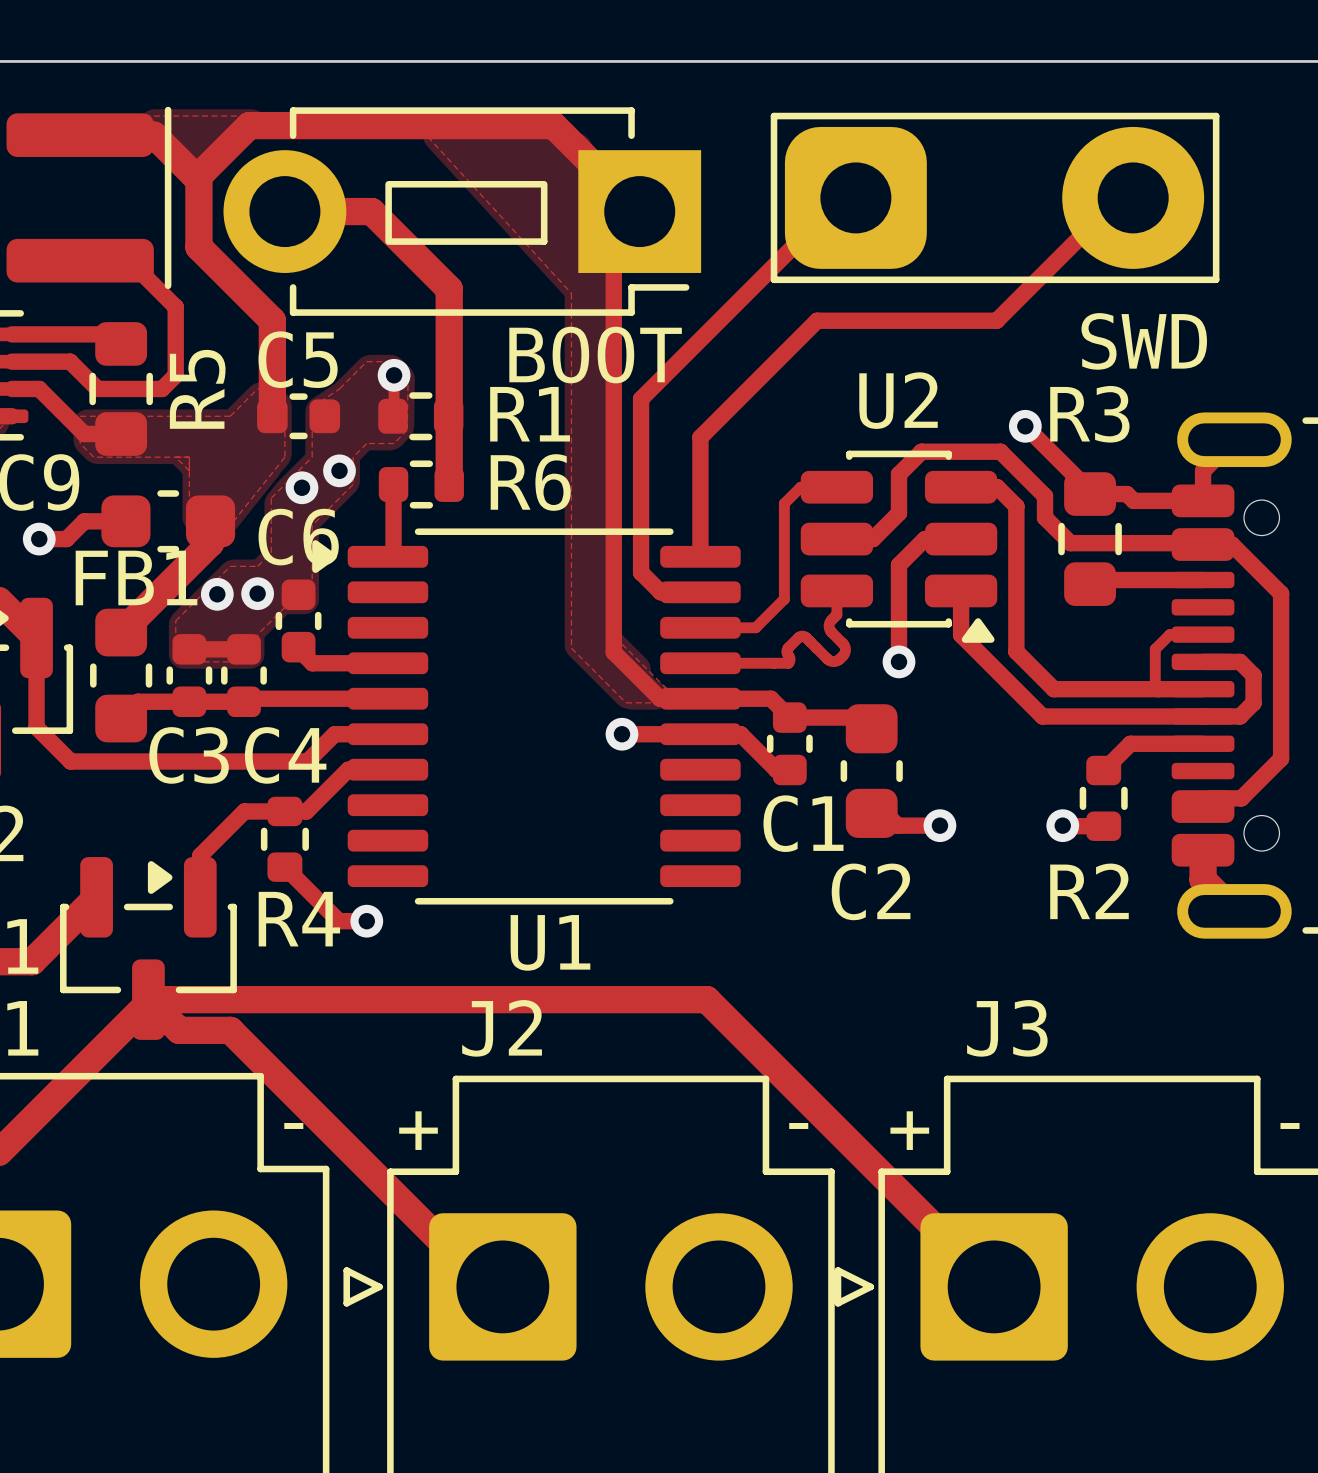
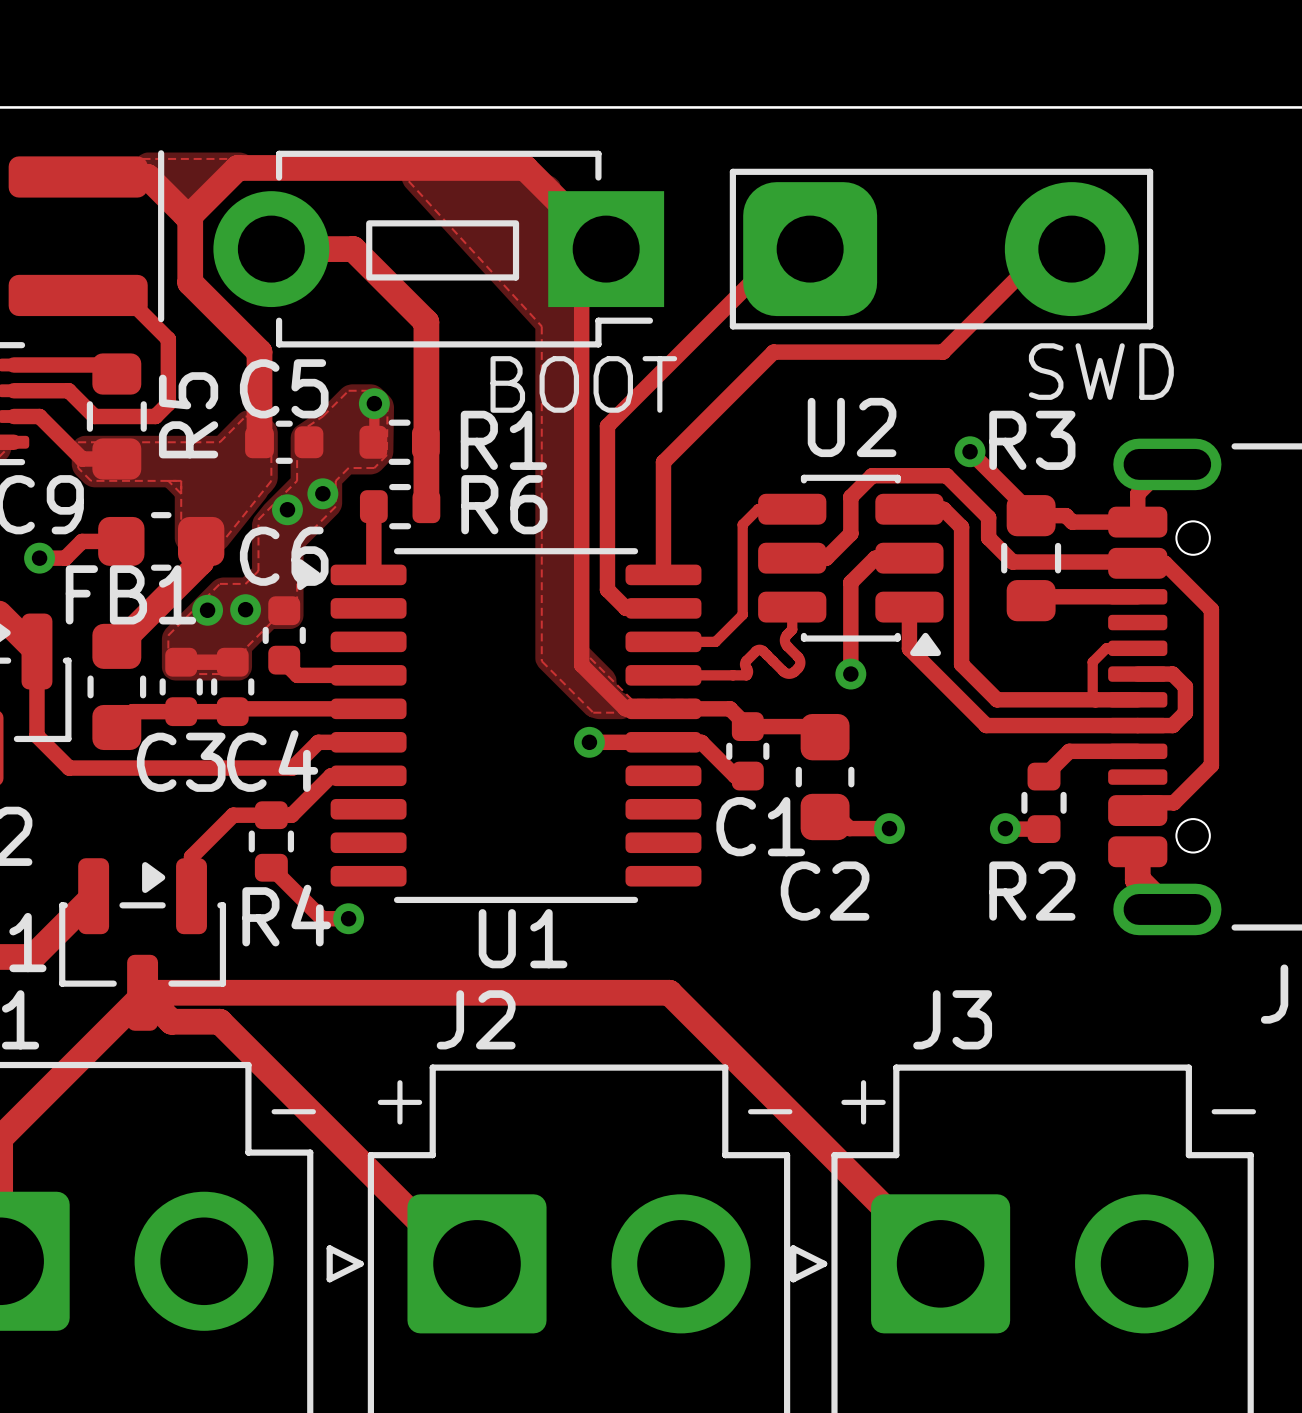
part position: (995, 197) -> (941, 249)

